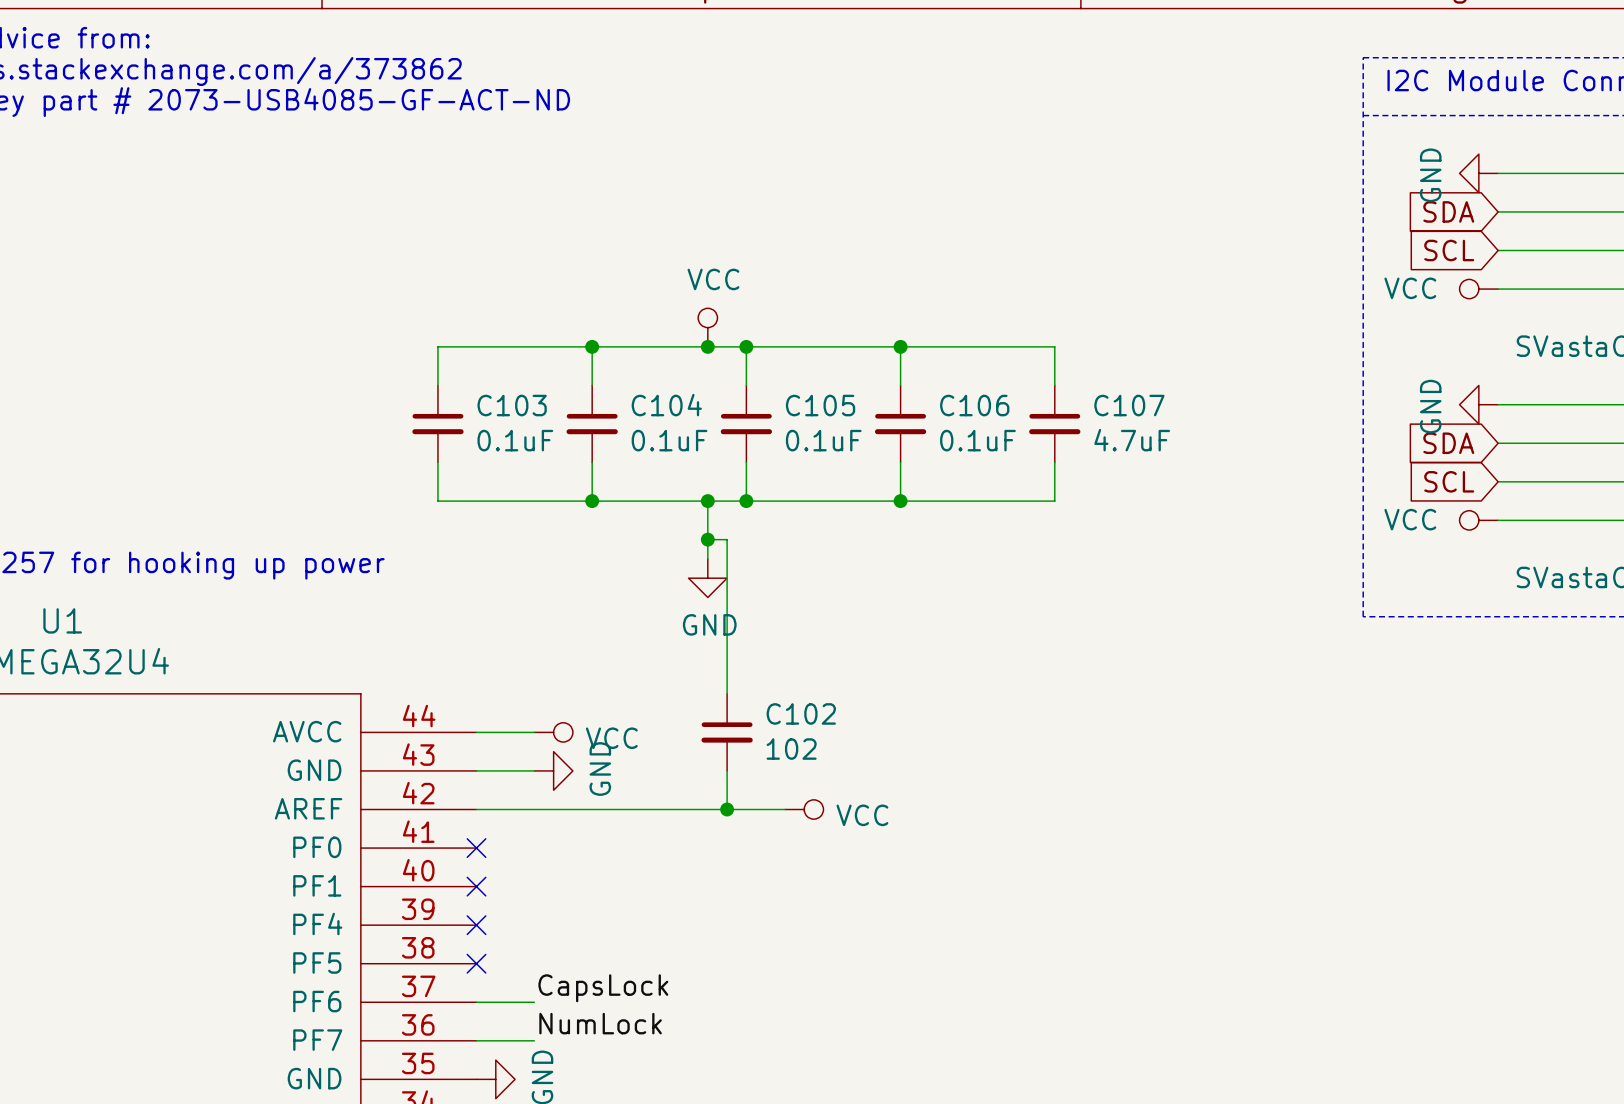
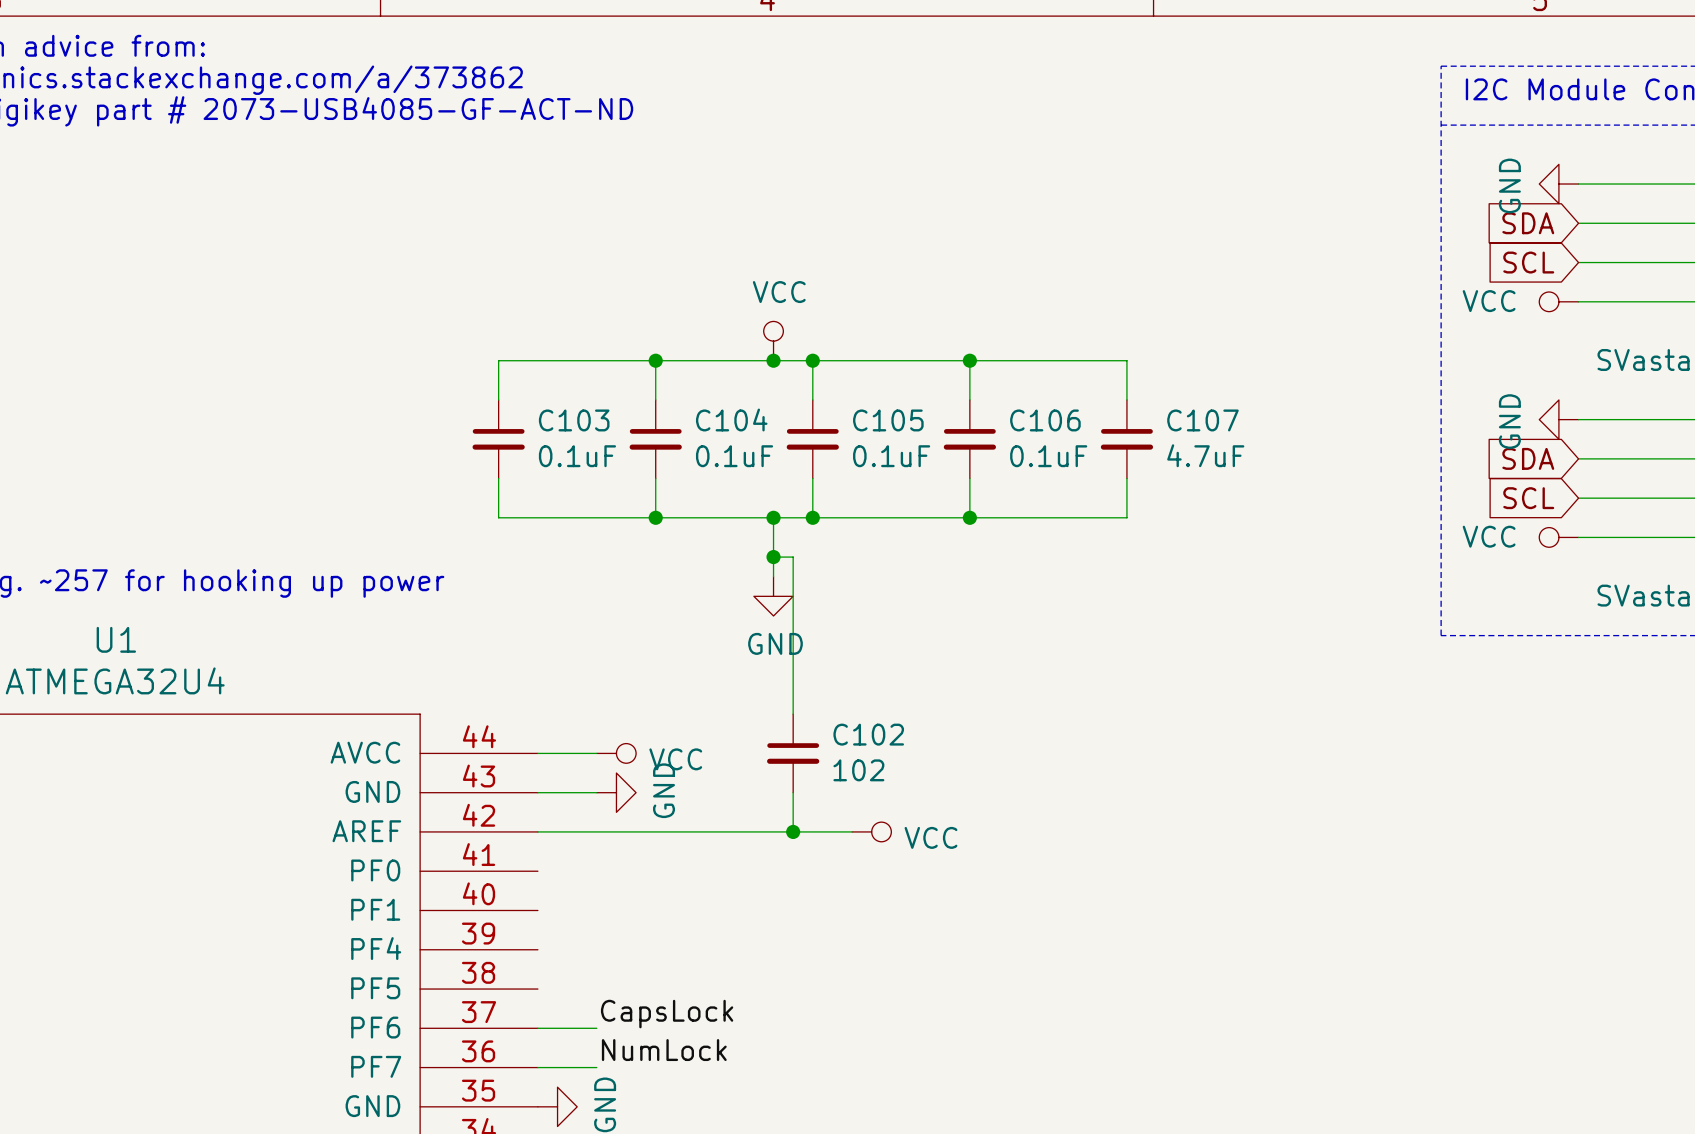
no-connect mark: (476, 848) -> none
no-connect mark: (476, 886) -> none
no-connect mark: (476, 925) -> none
no-connect mark: (476, 963) -> none

